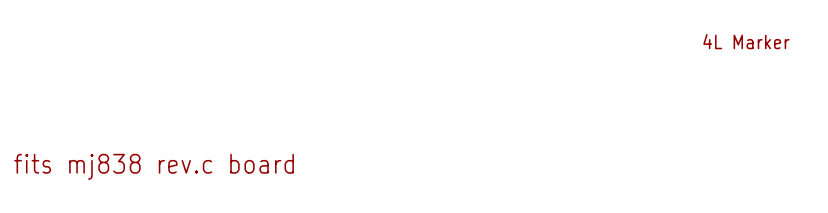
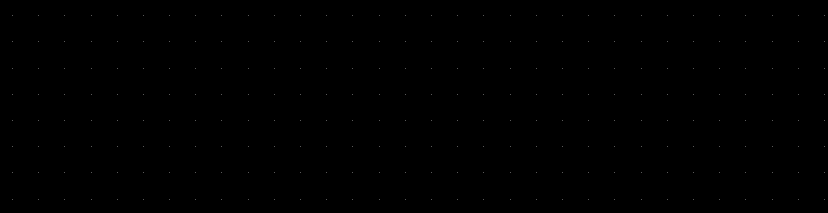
part: (746, 41) -> none
text: fits mj838 rev.c board (154, 166) -> none

